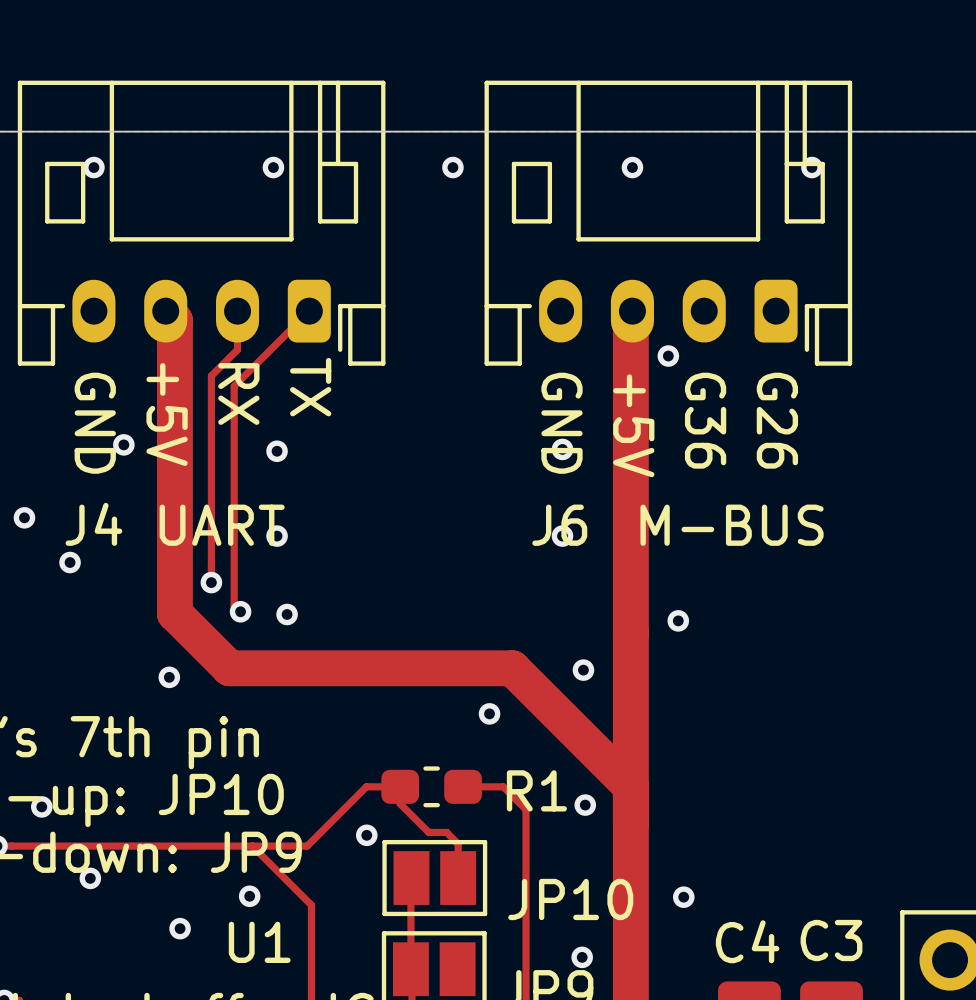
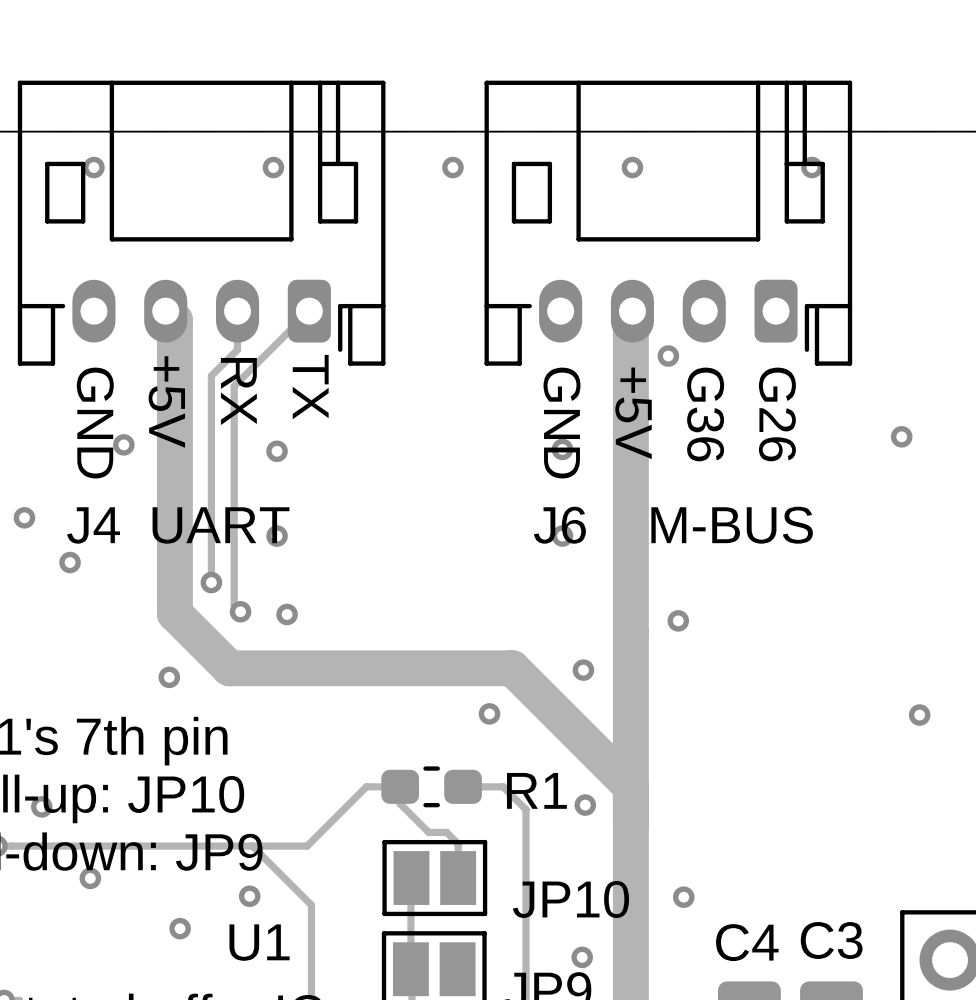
via: none -> (901, 436)
via: none -> (919, 715)
via: (366, 835) -> none

